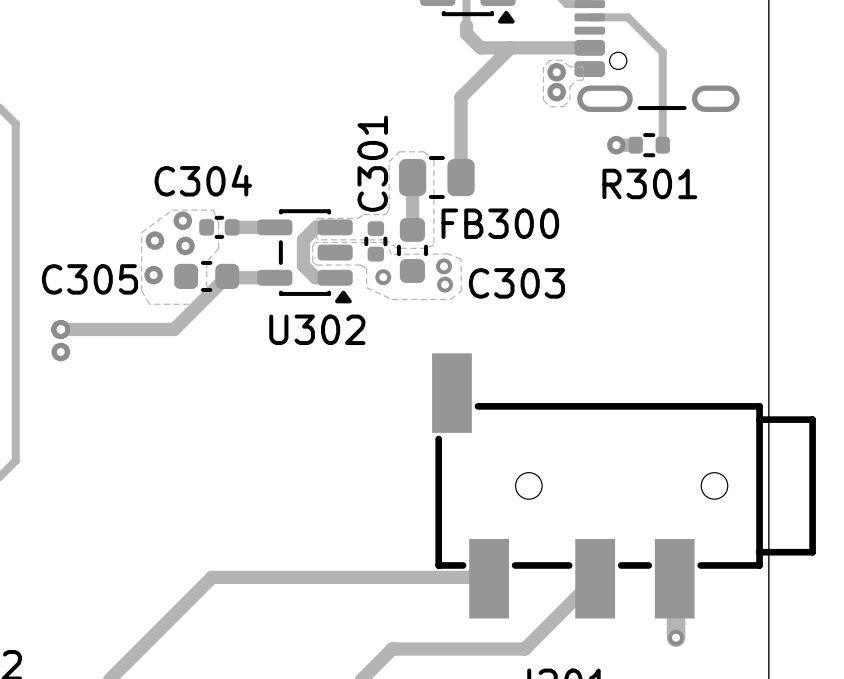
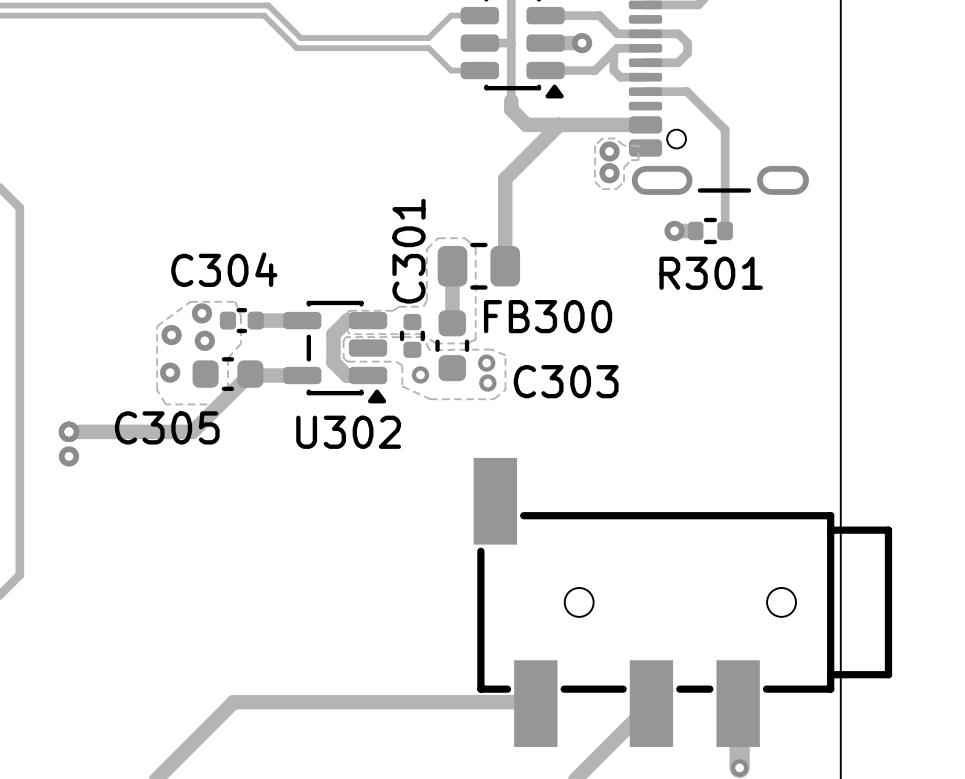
C305 name position: C305 (89, 279) -> C305 (167, 427)

